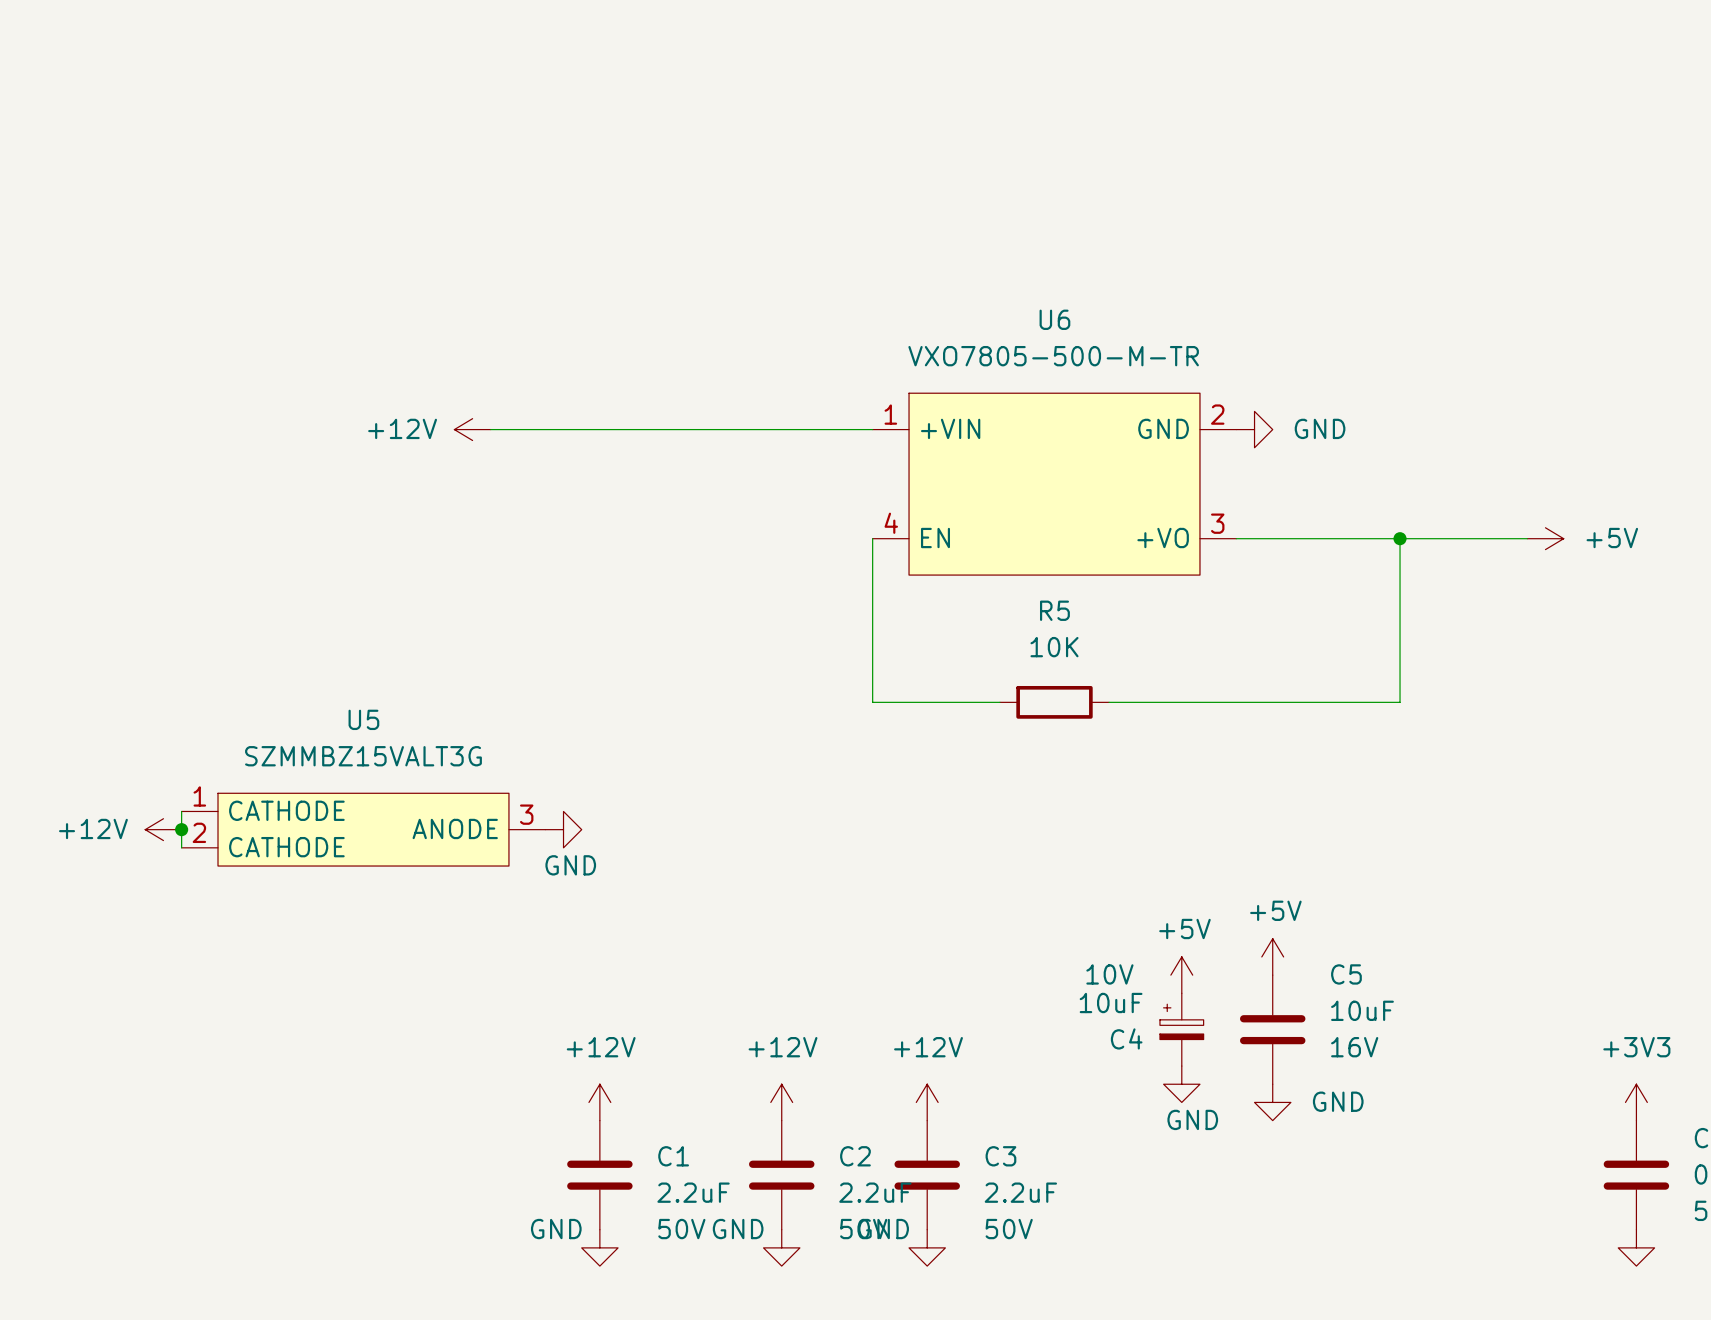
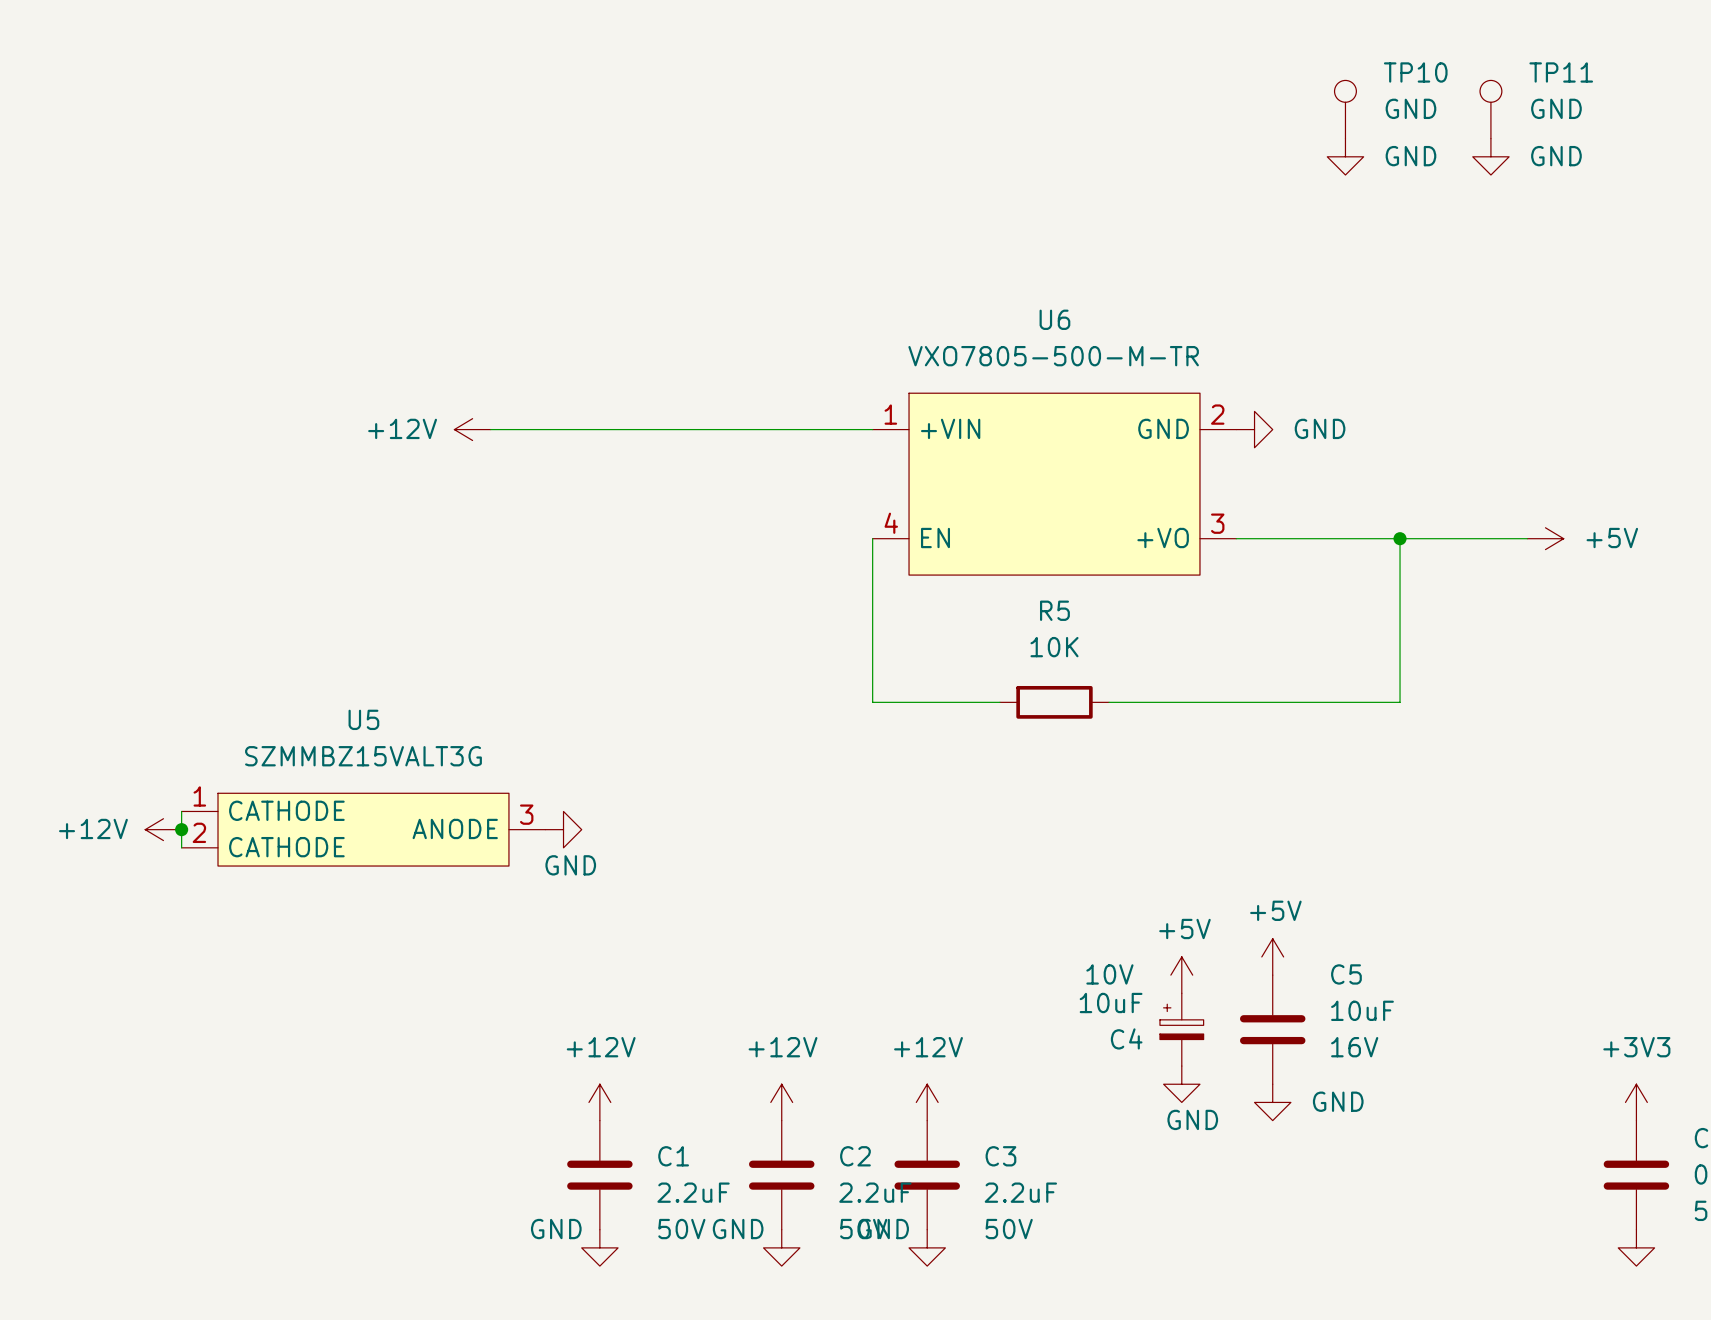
TP10: none -> GND (1345, 109)
TP11: none -> GND (1490, 109)
power symbol: none -> GND (1345, 156)
power symbol: none -> GND (1490, 156)

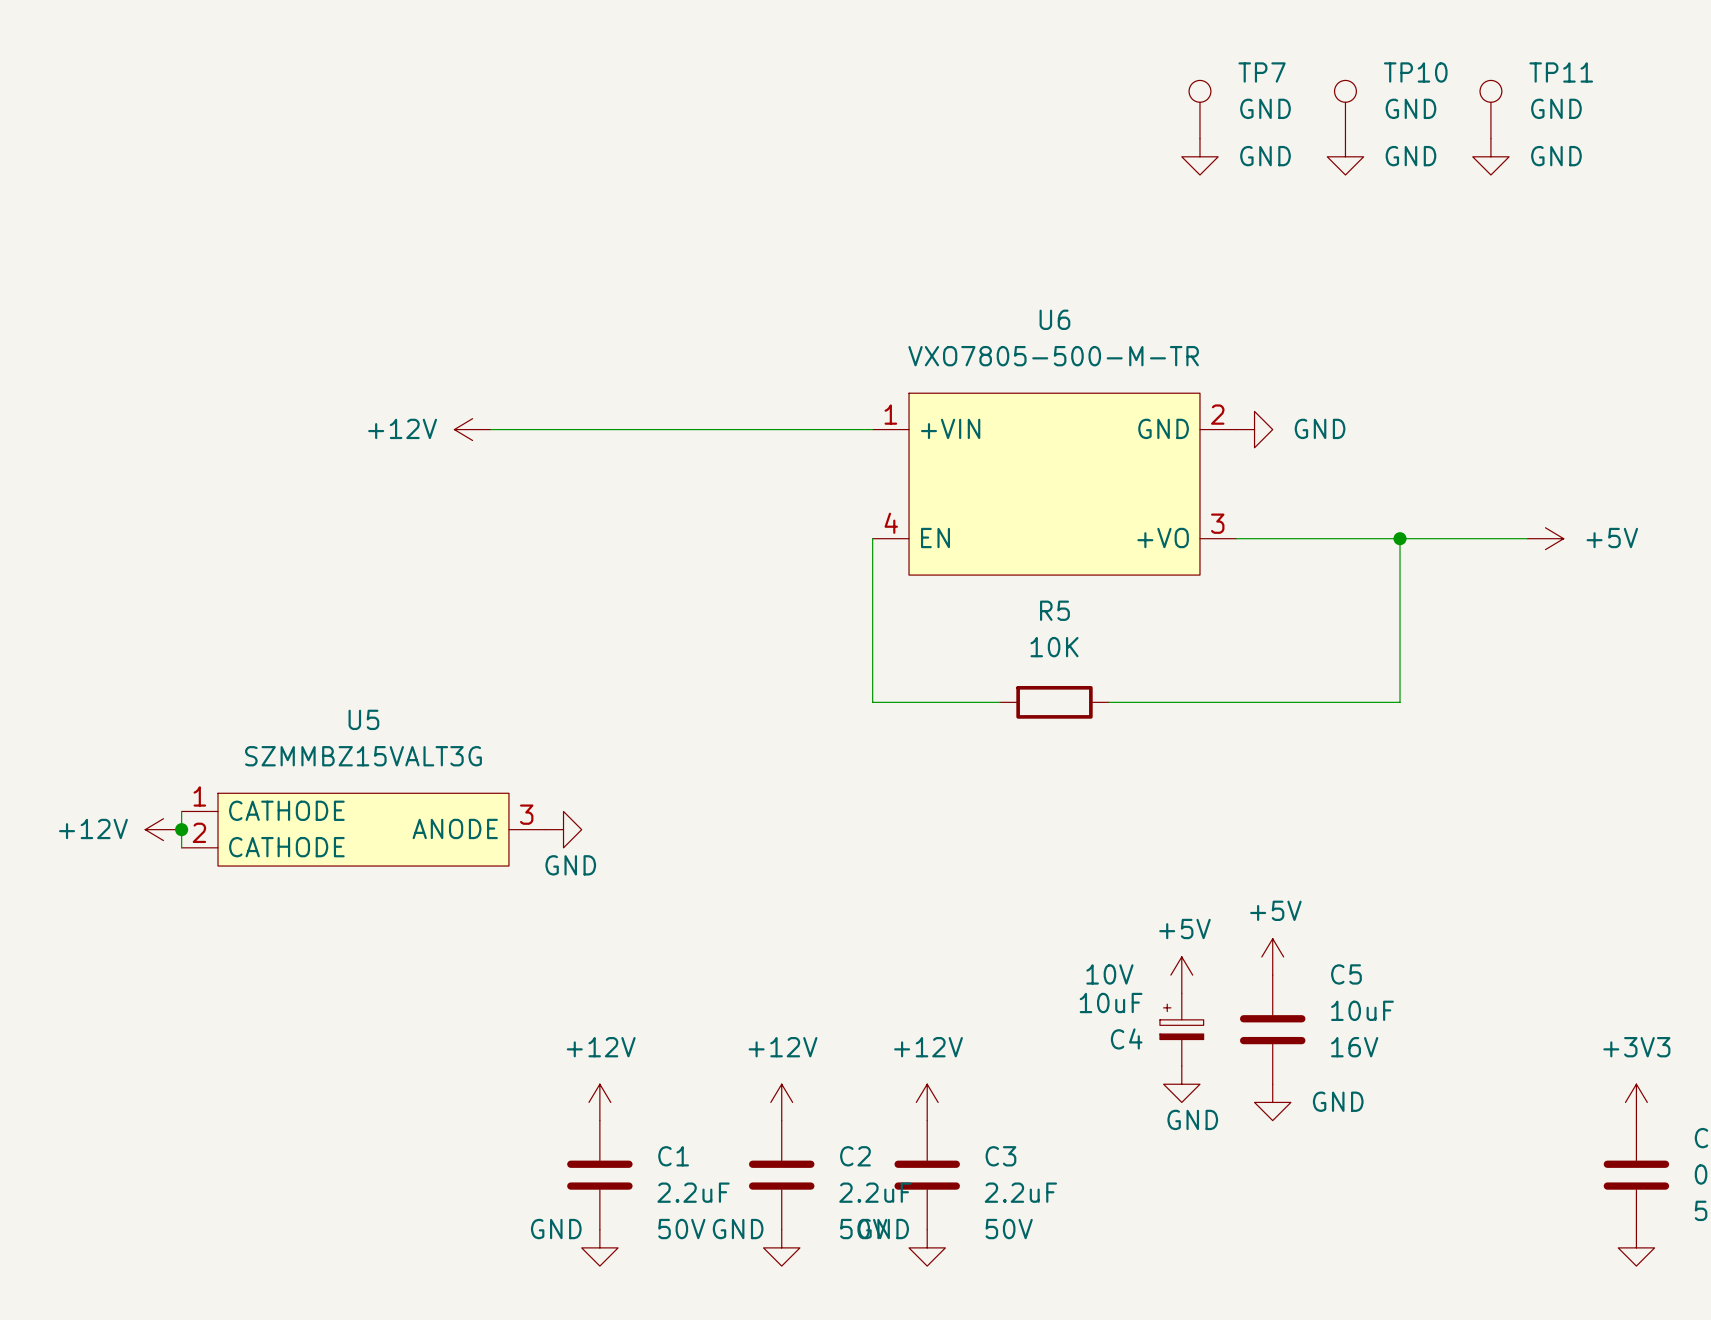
TP7: none -> GND (1199, 109)
power symbol: none -> GND (1199, 156)

